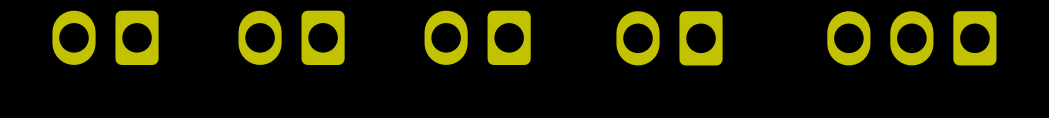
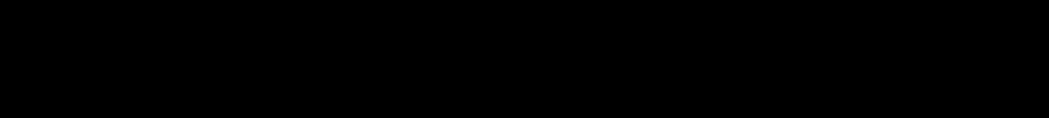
part: (105, 37) -> none
part: (291, 37) -> none
part: (477, 37) -> none
part: (669, 38) -> none
part: (911, 38) -> none

